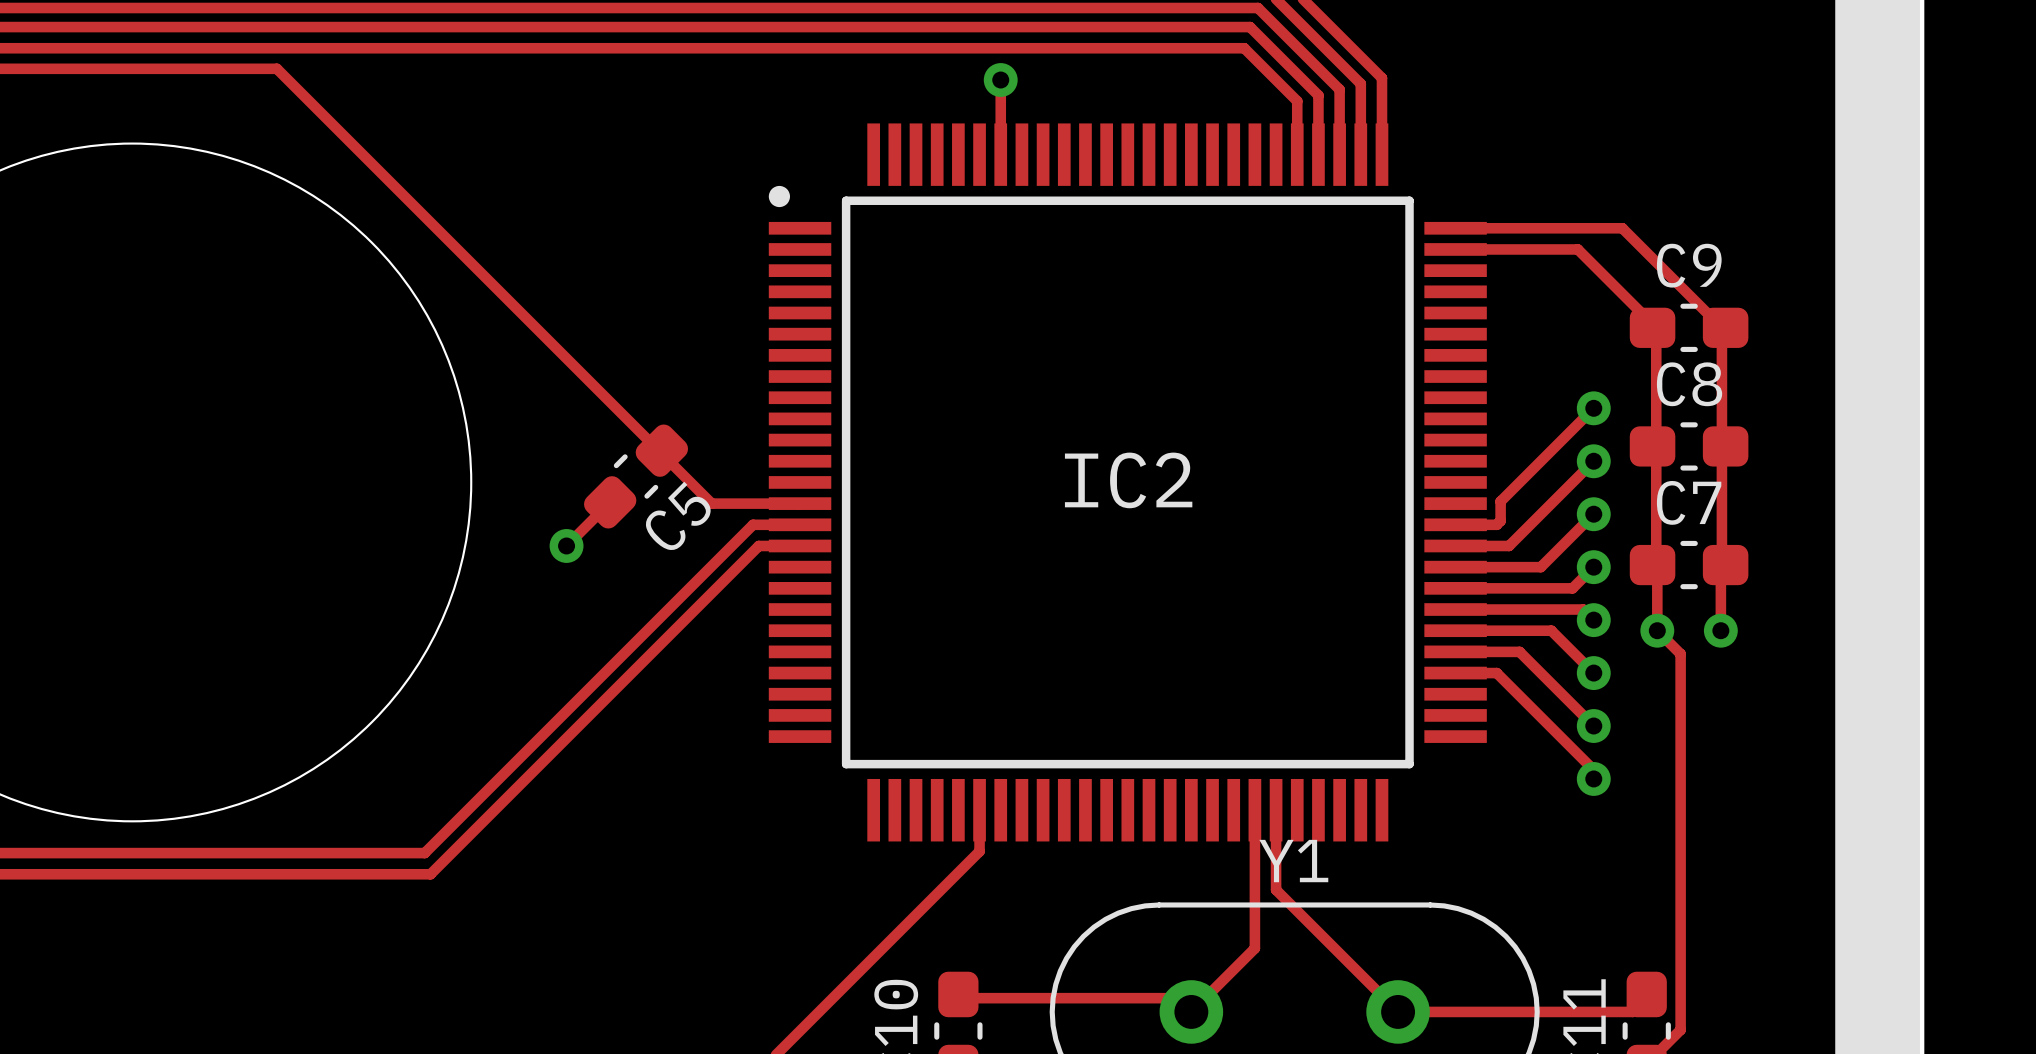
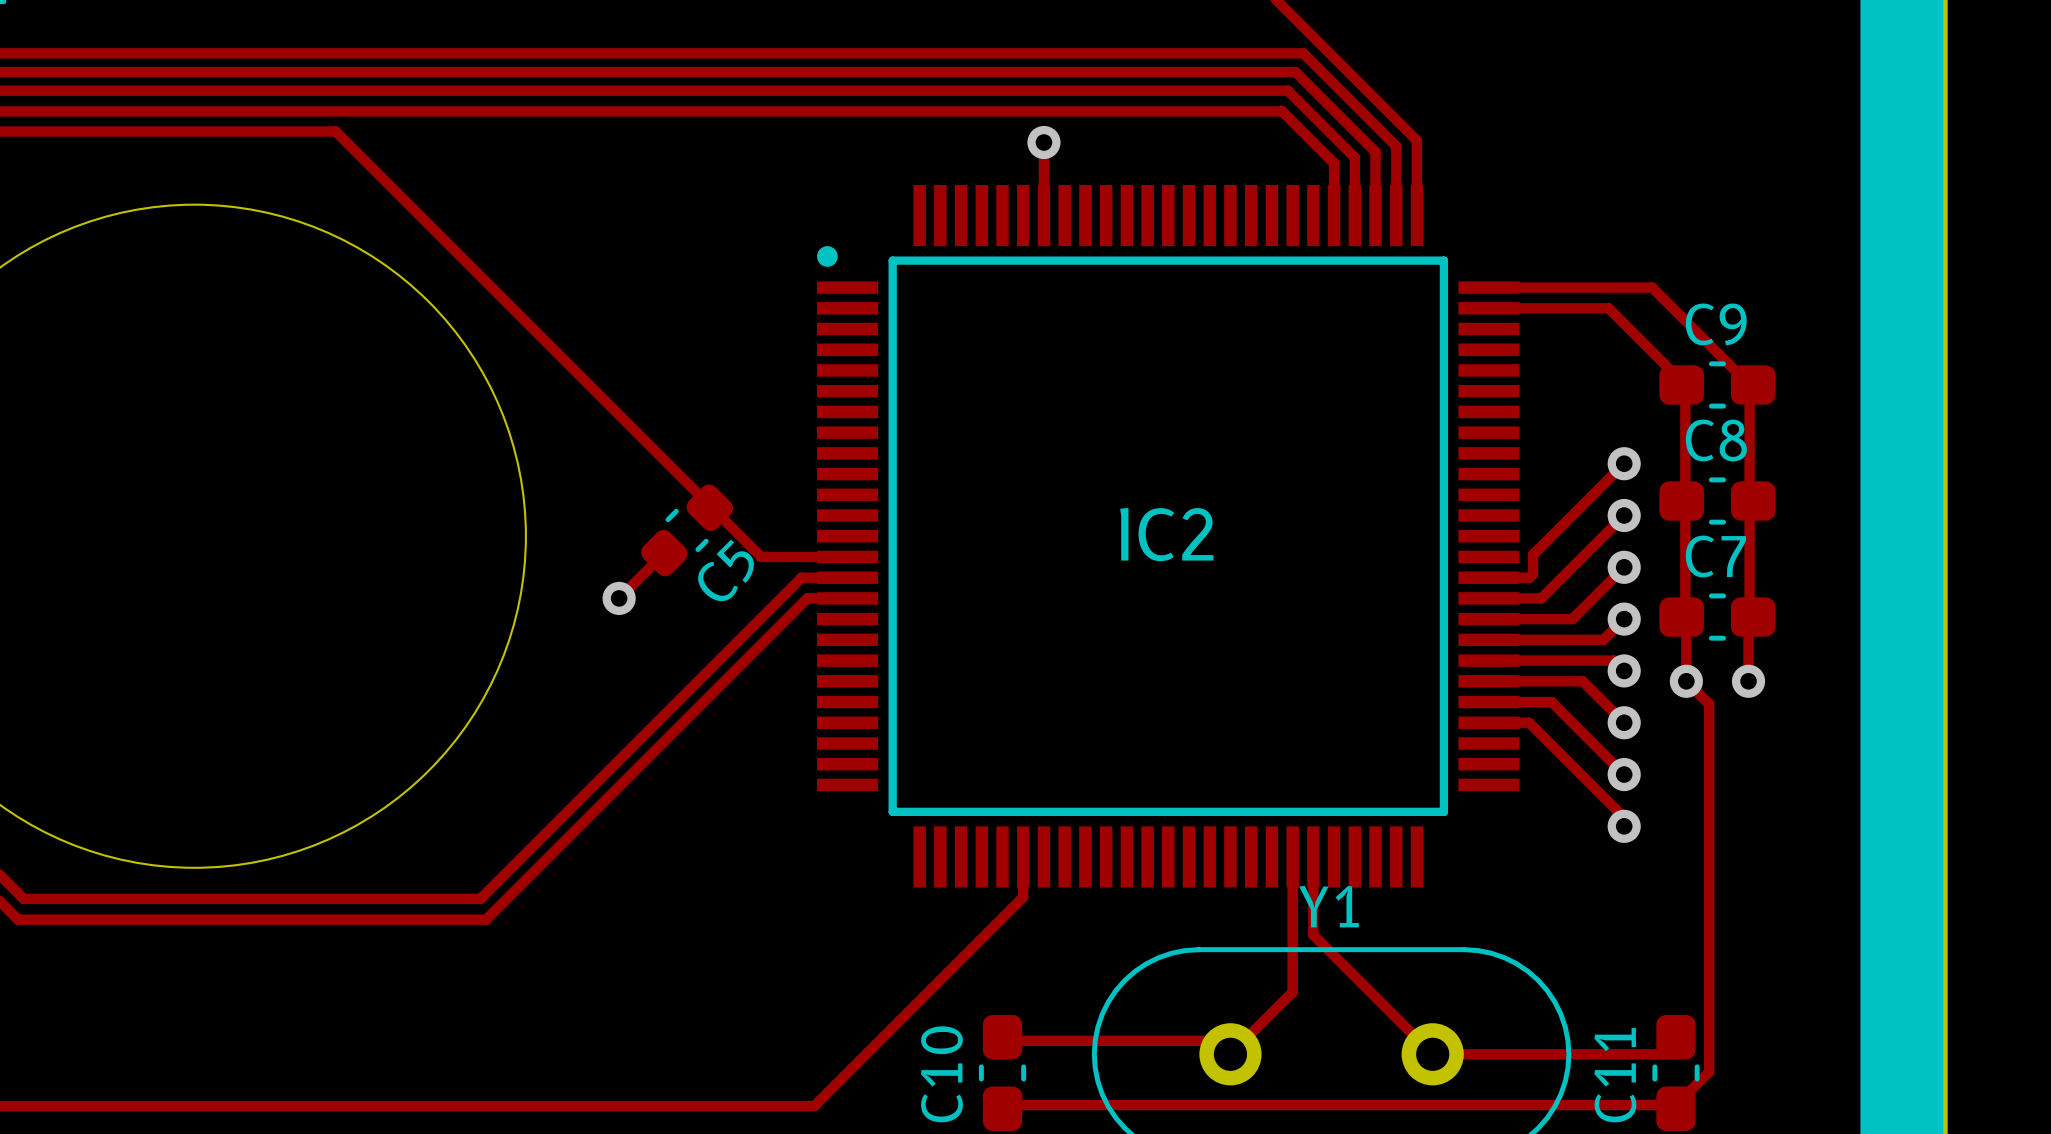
C5 footprint: [584, 424, 689, 529] -> [641, 484, 734, 577]

